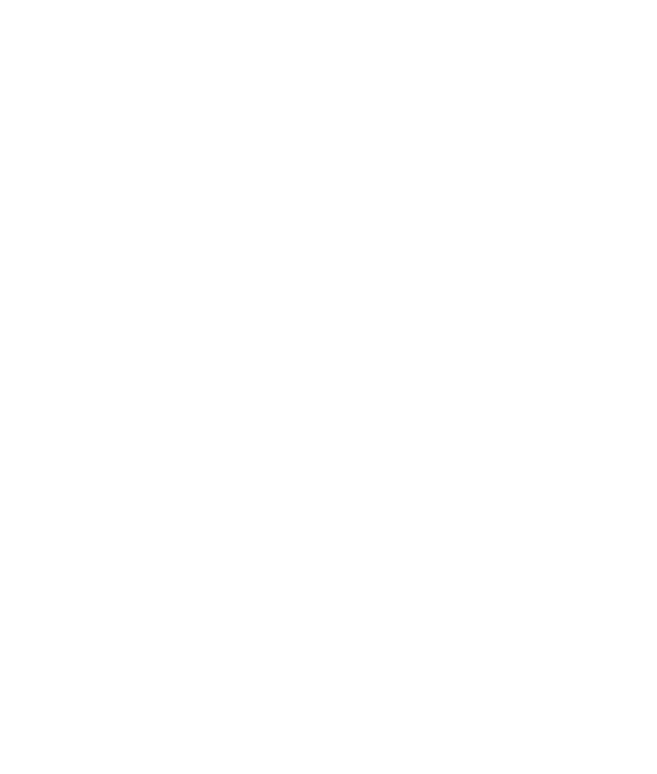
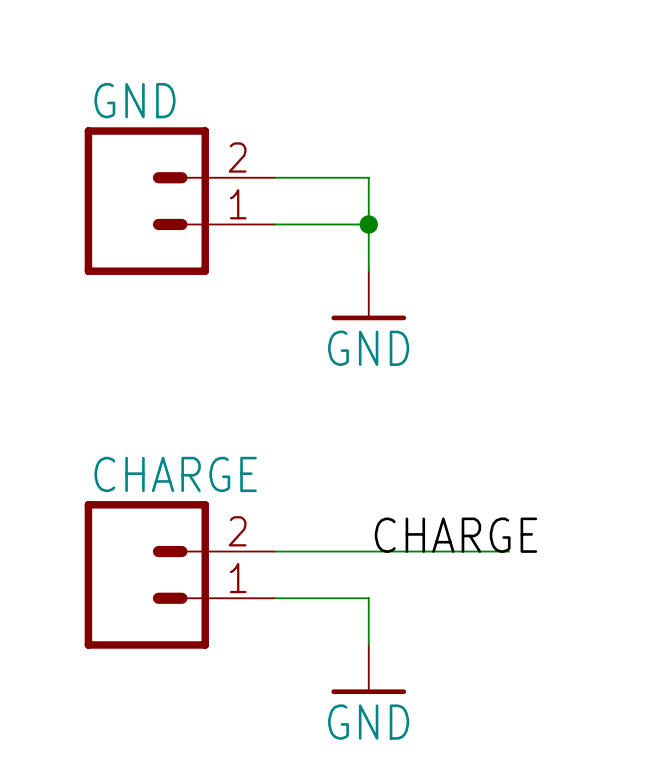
wire: none -> (275, 177) (368, 177) (368, 271)
GND: none -> (180, 201)
wire: none -> (275, 224) (368, 224)
junction: none -> (368, 224)
power symbol: none -> GND (368, 295)
label: none -> CHARGE (455, 535)
wire: none -> (275, 551) (508, 551)
CHARGE: none -> (180, 574)
wire: none -> (275, 598) (368, 598) (368, 644)
power symbol: none -> GND (368, 669)

